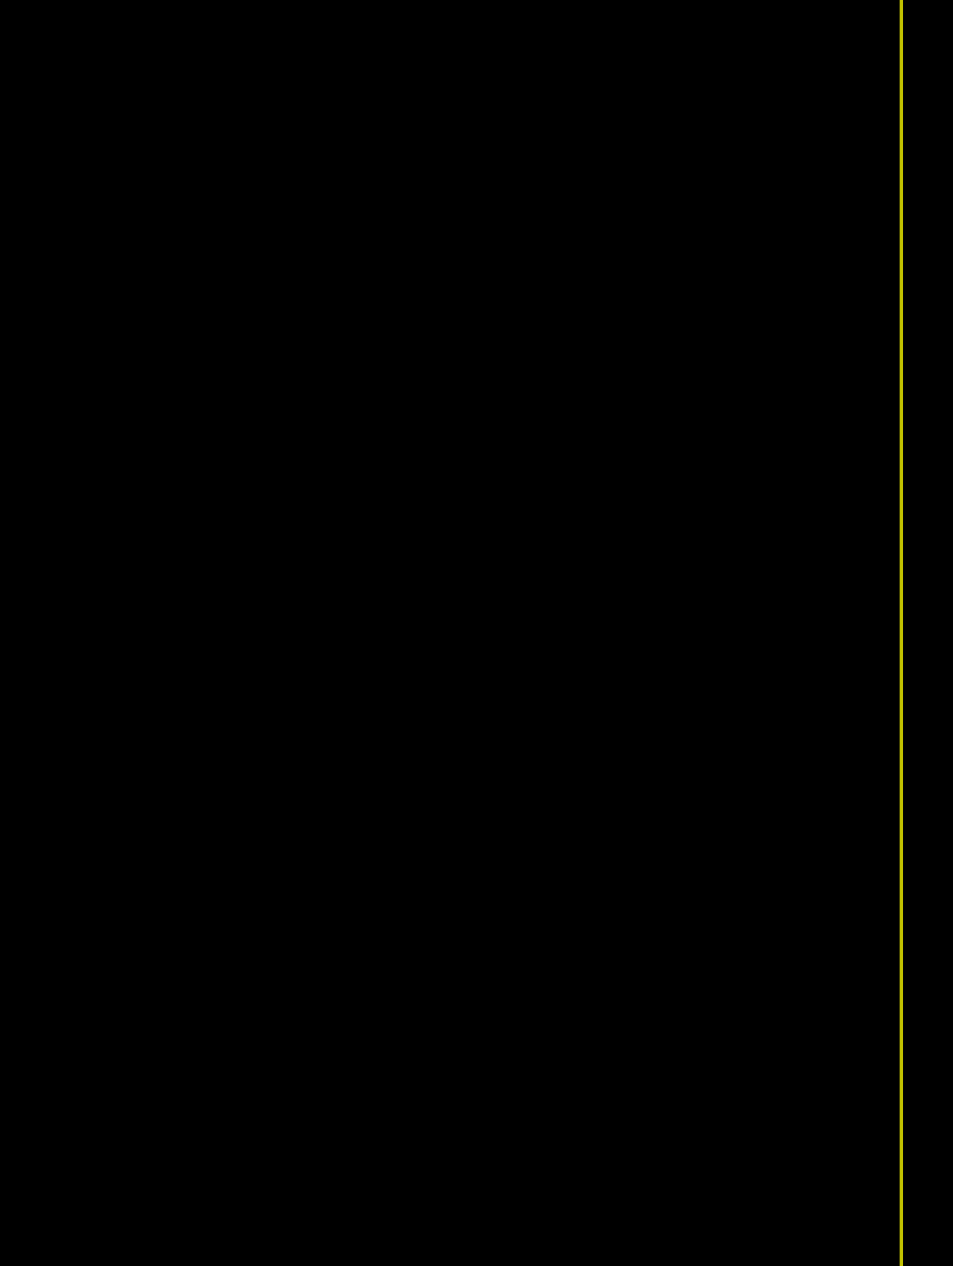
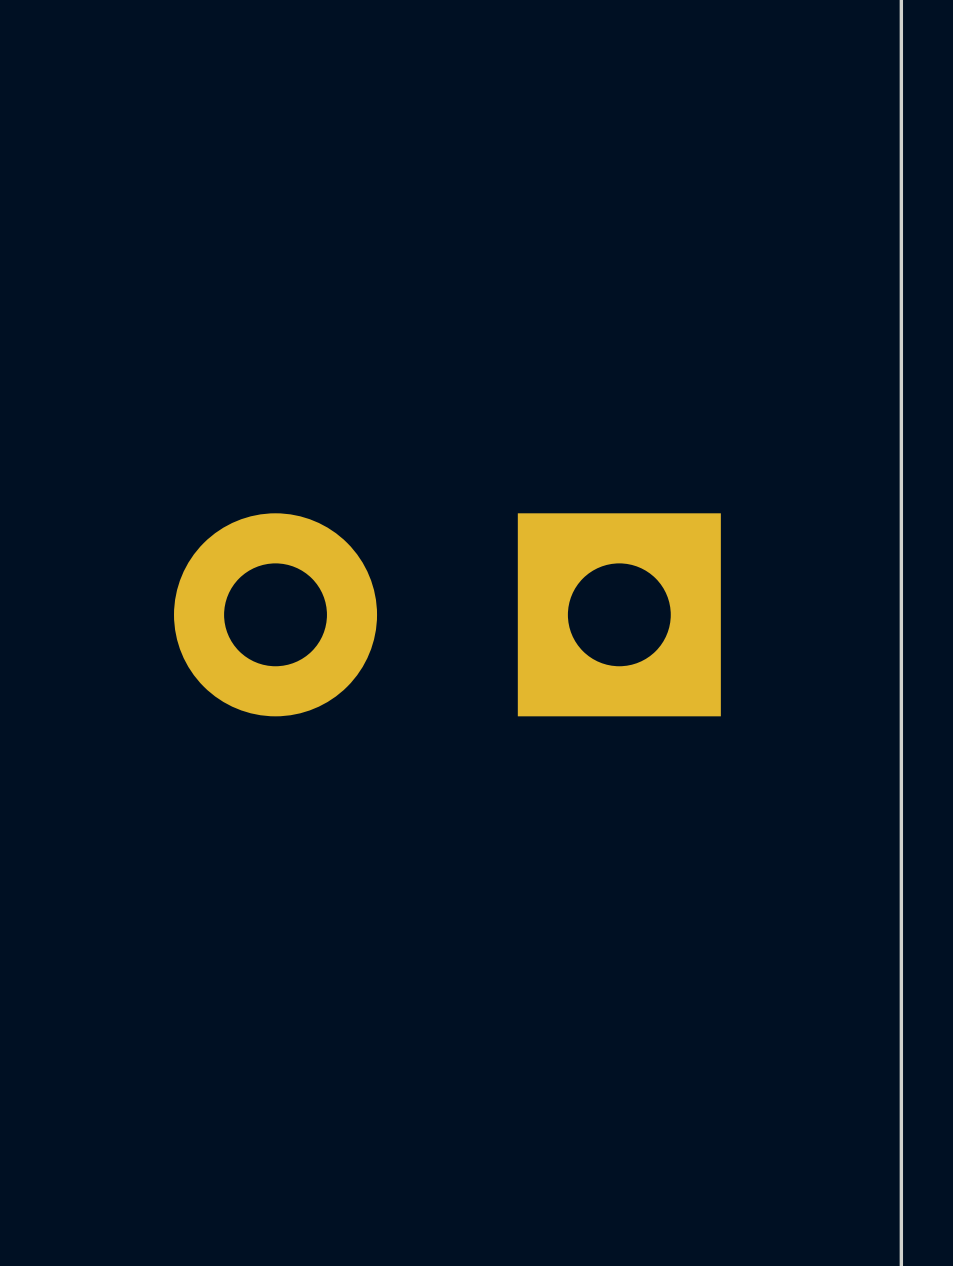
part: none -> (447, 614)

